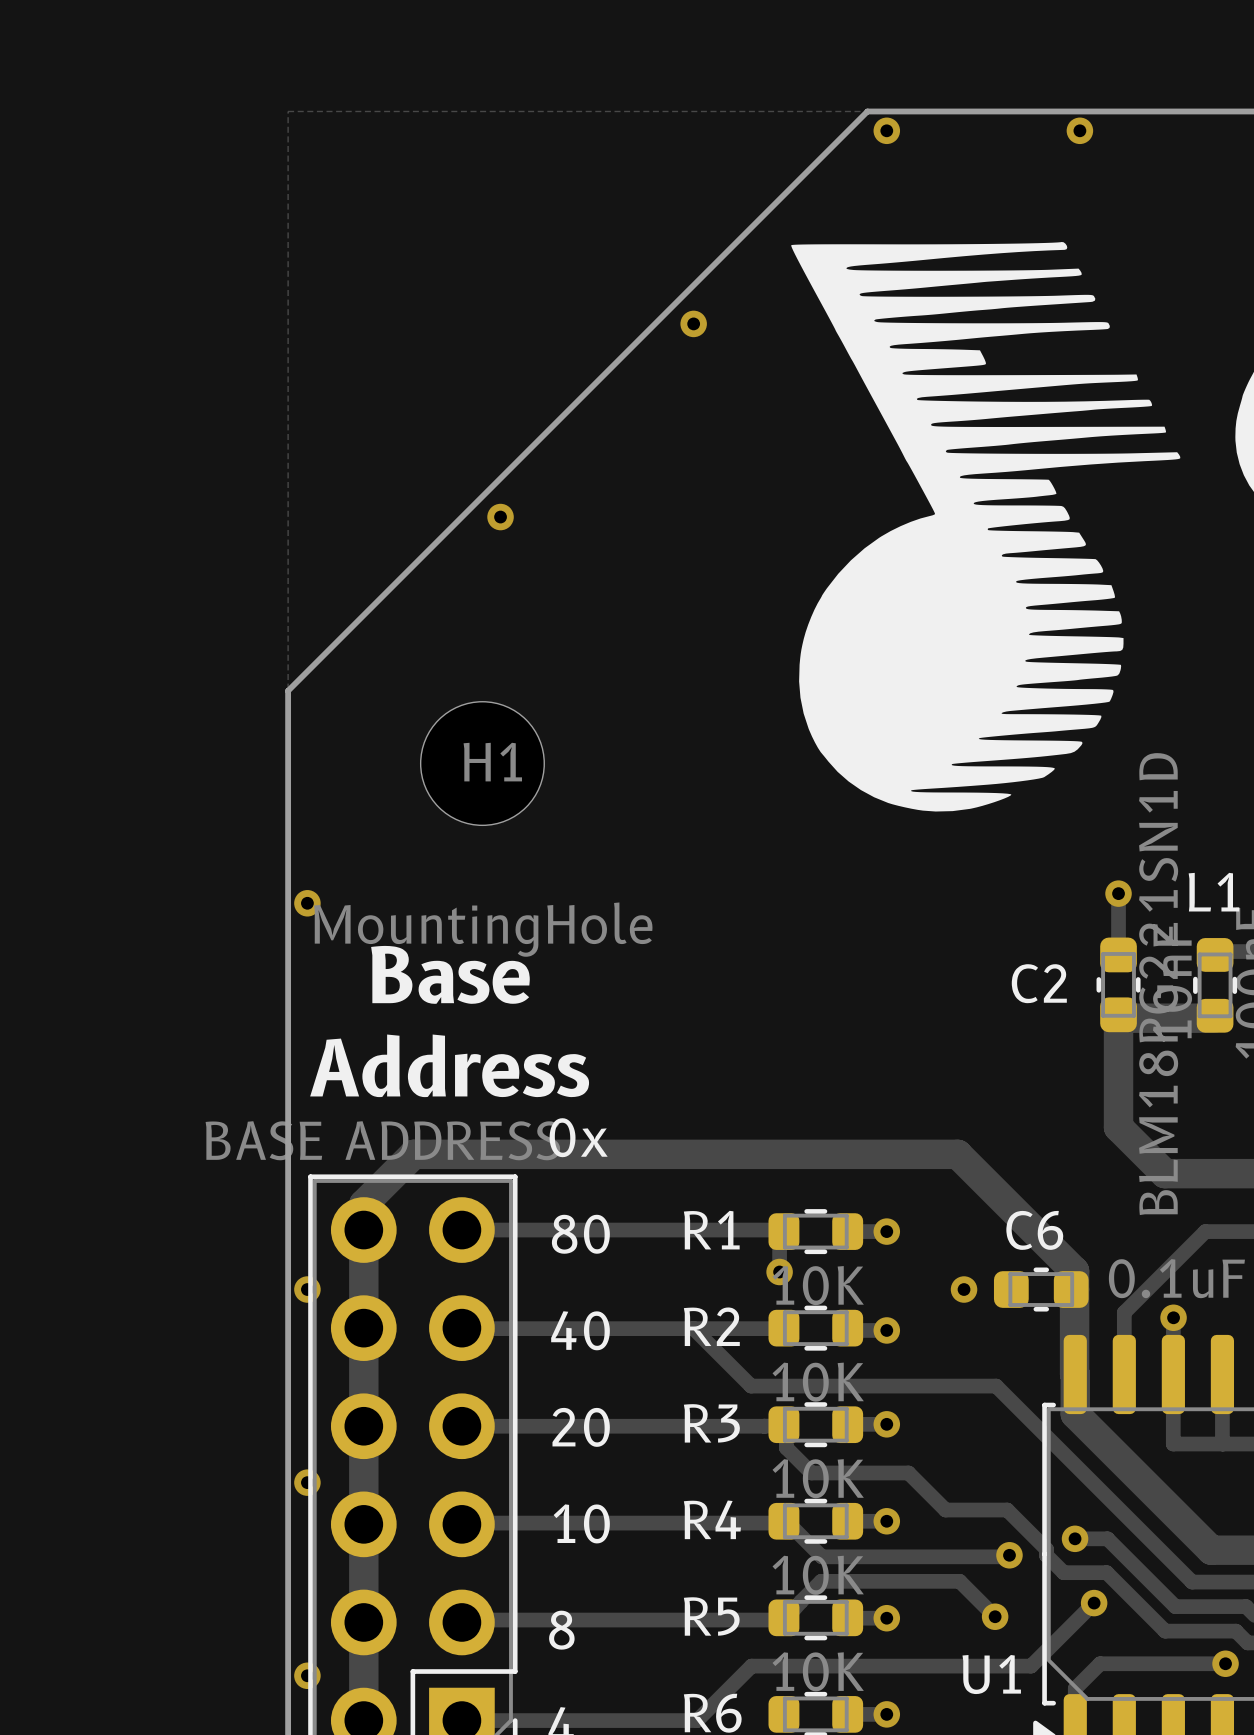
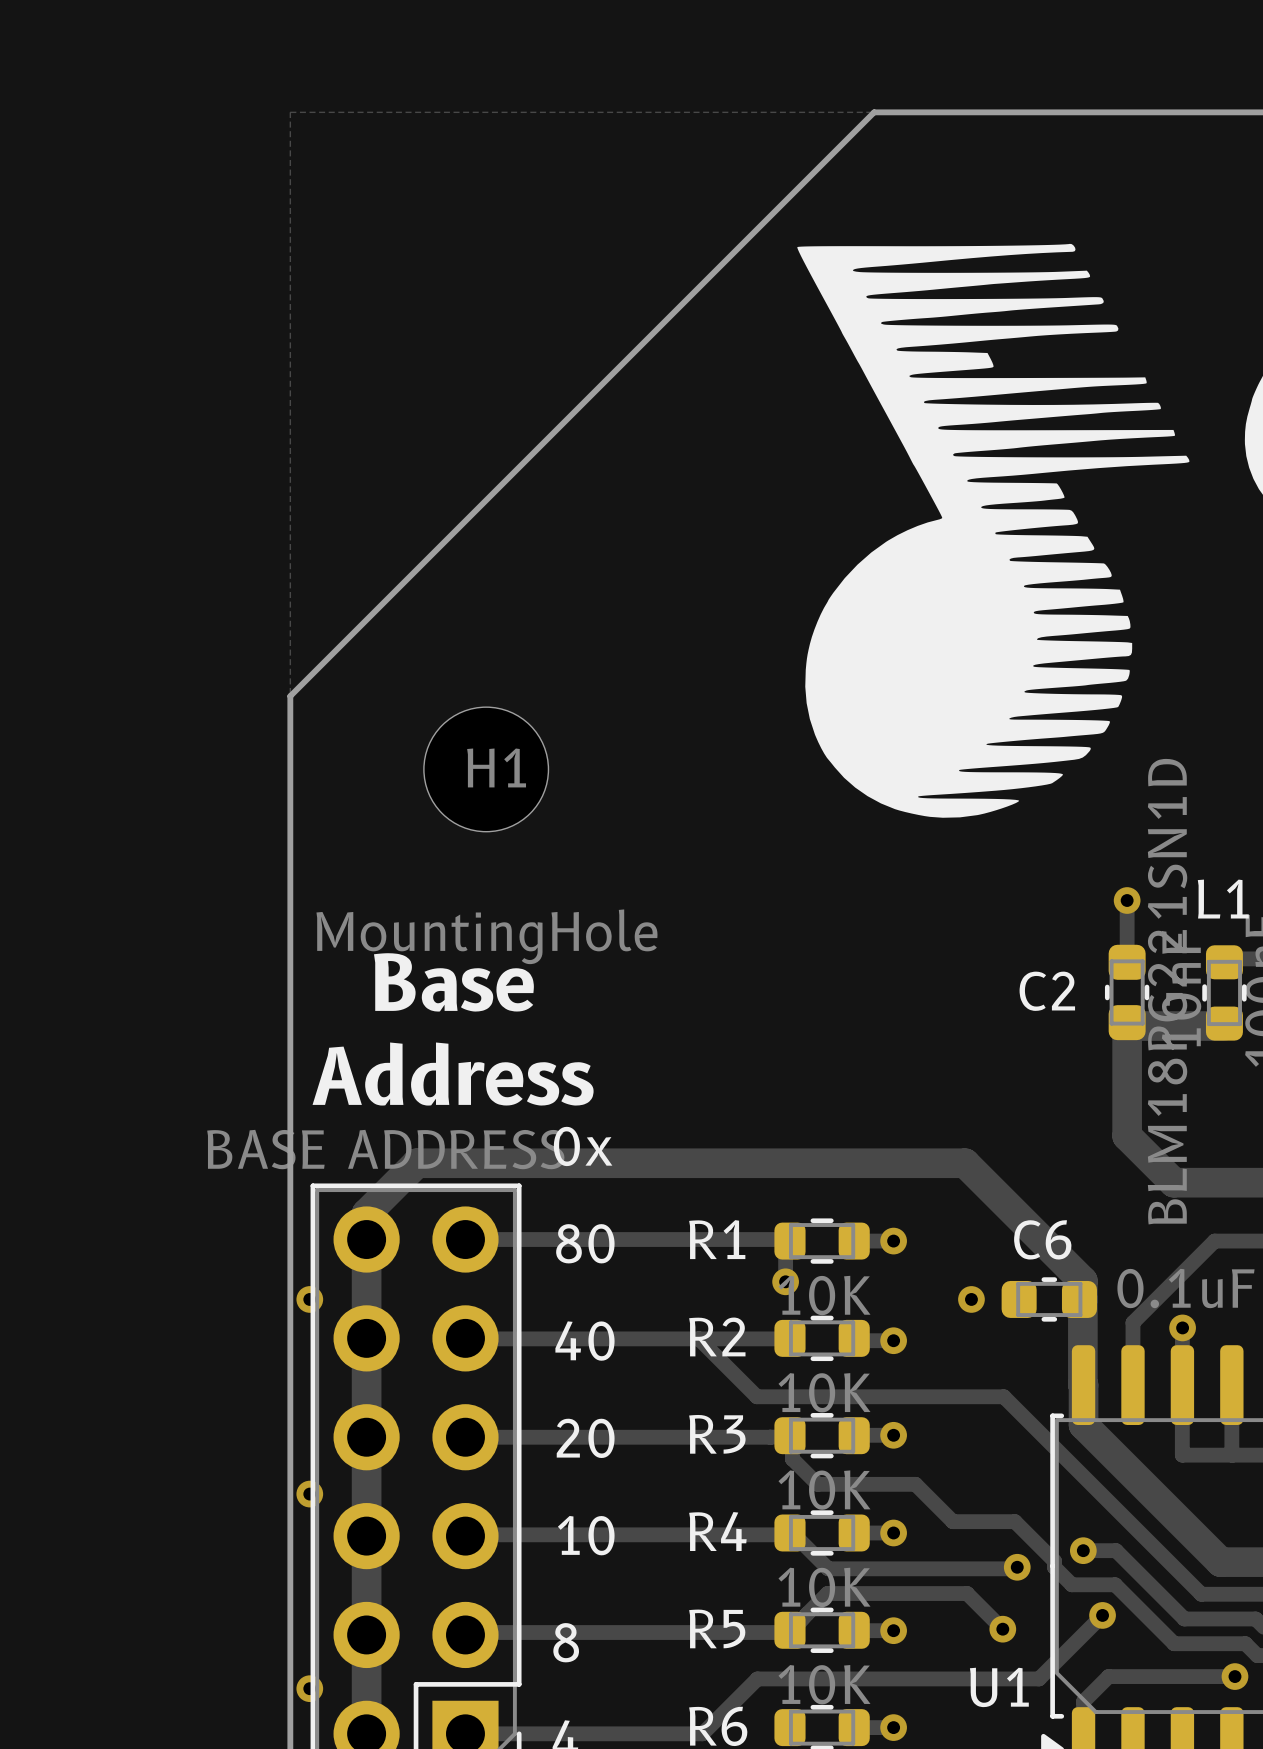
via: (886, 130) -> none
via: (1079, 130) -> none
via: (693, 323) -> none
via: (500, 517) -> none
via: (307, 903) -> none

